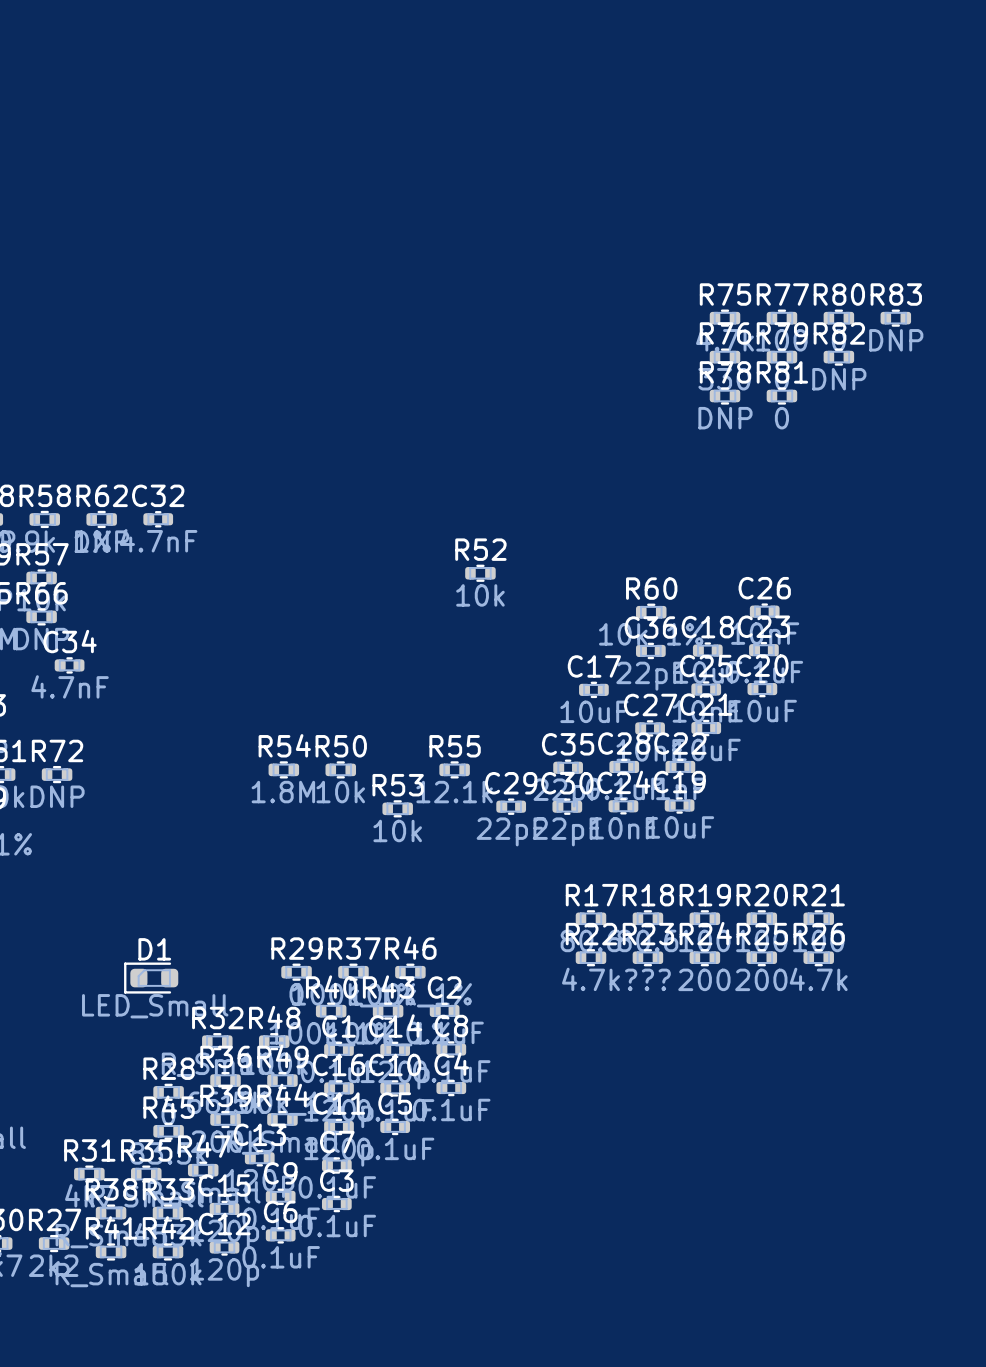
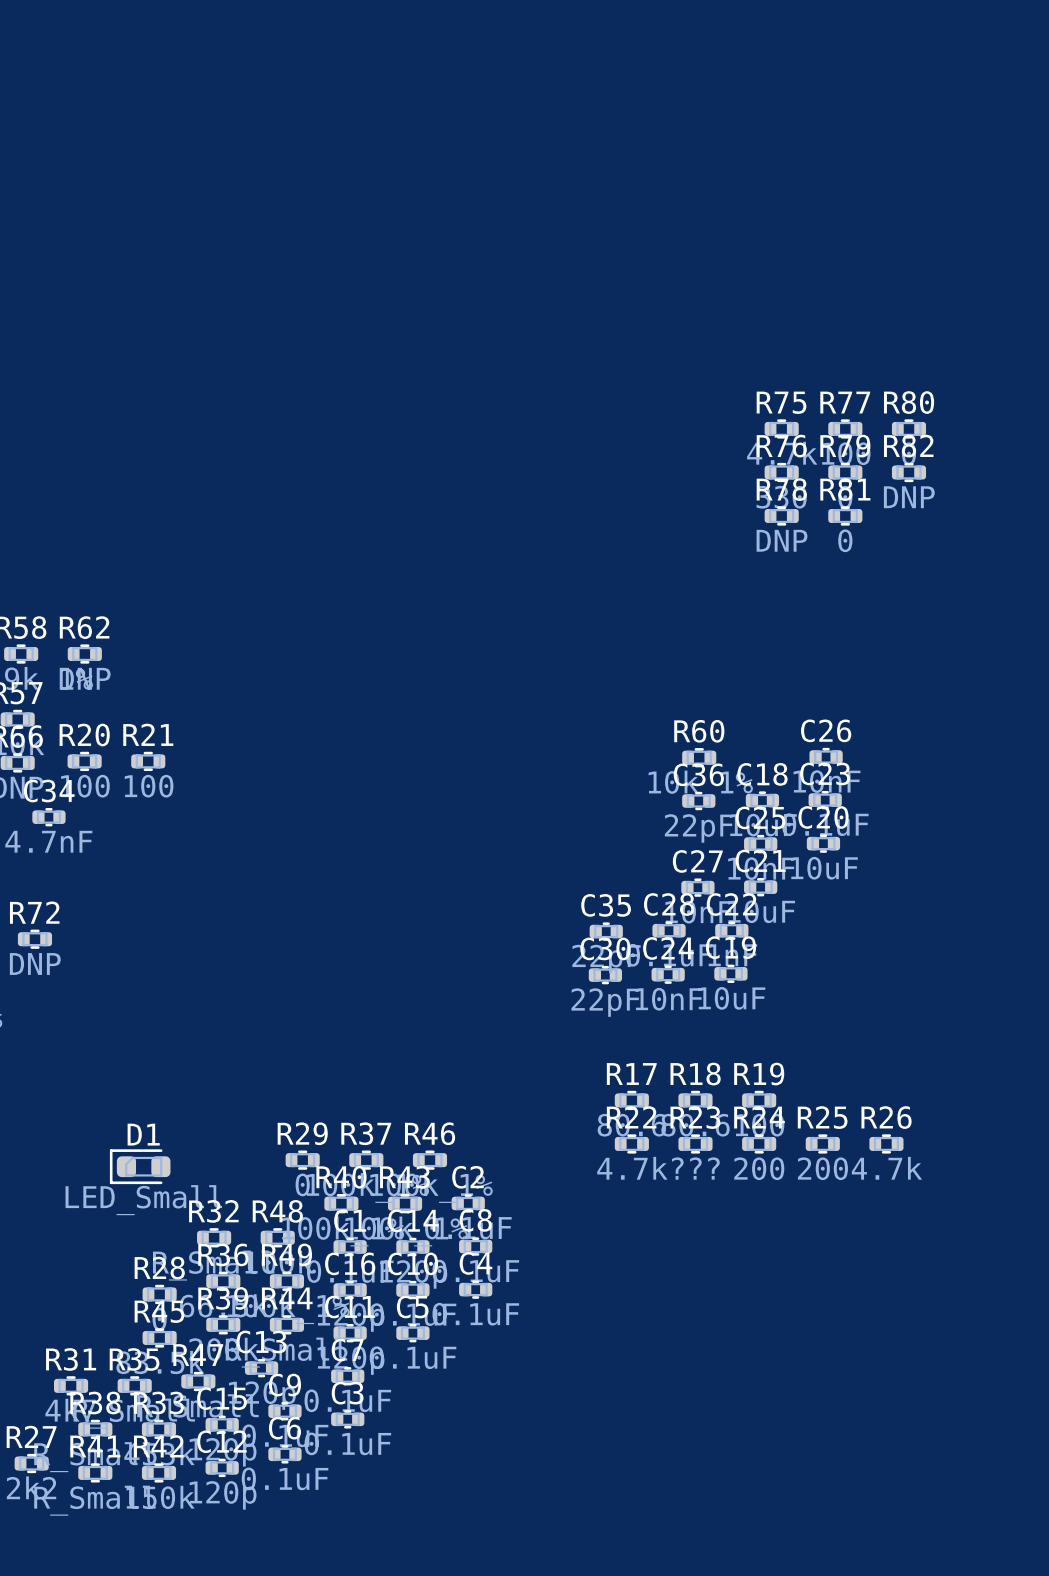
R83: DNP (895, 318) -> none
C32: 4.7nF (158, 519) -> none
R52: 10k (480, 573) -> none
C17: 10uF (593, 689) -> none
R54: 1.8M (283, 769) -> none
R50: 10k (340, 769) -> none
R55: 12.1k (454, 769) -> none
C29: 22pF (511, 806) -> none
R53: 10k (397, 808) -> none
R20 position: (761, 918) -> (84, 761)
R21 position: (818, 918) -> (148, 761)

